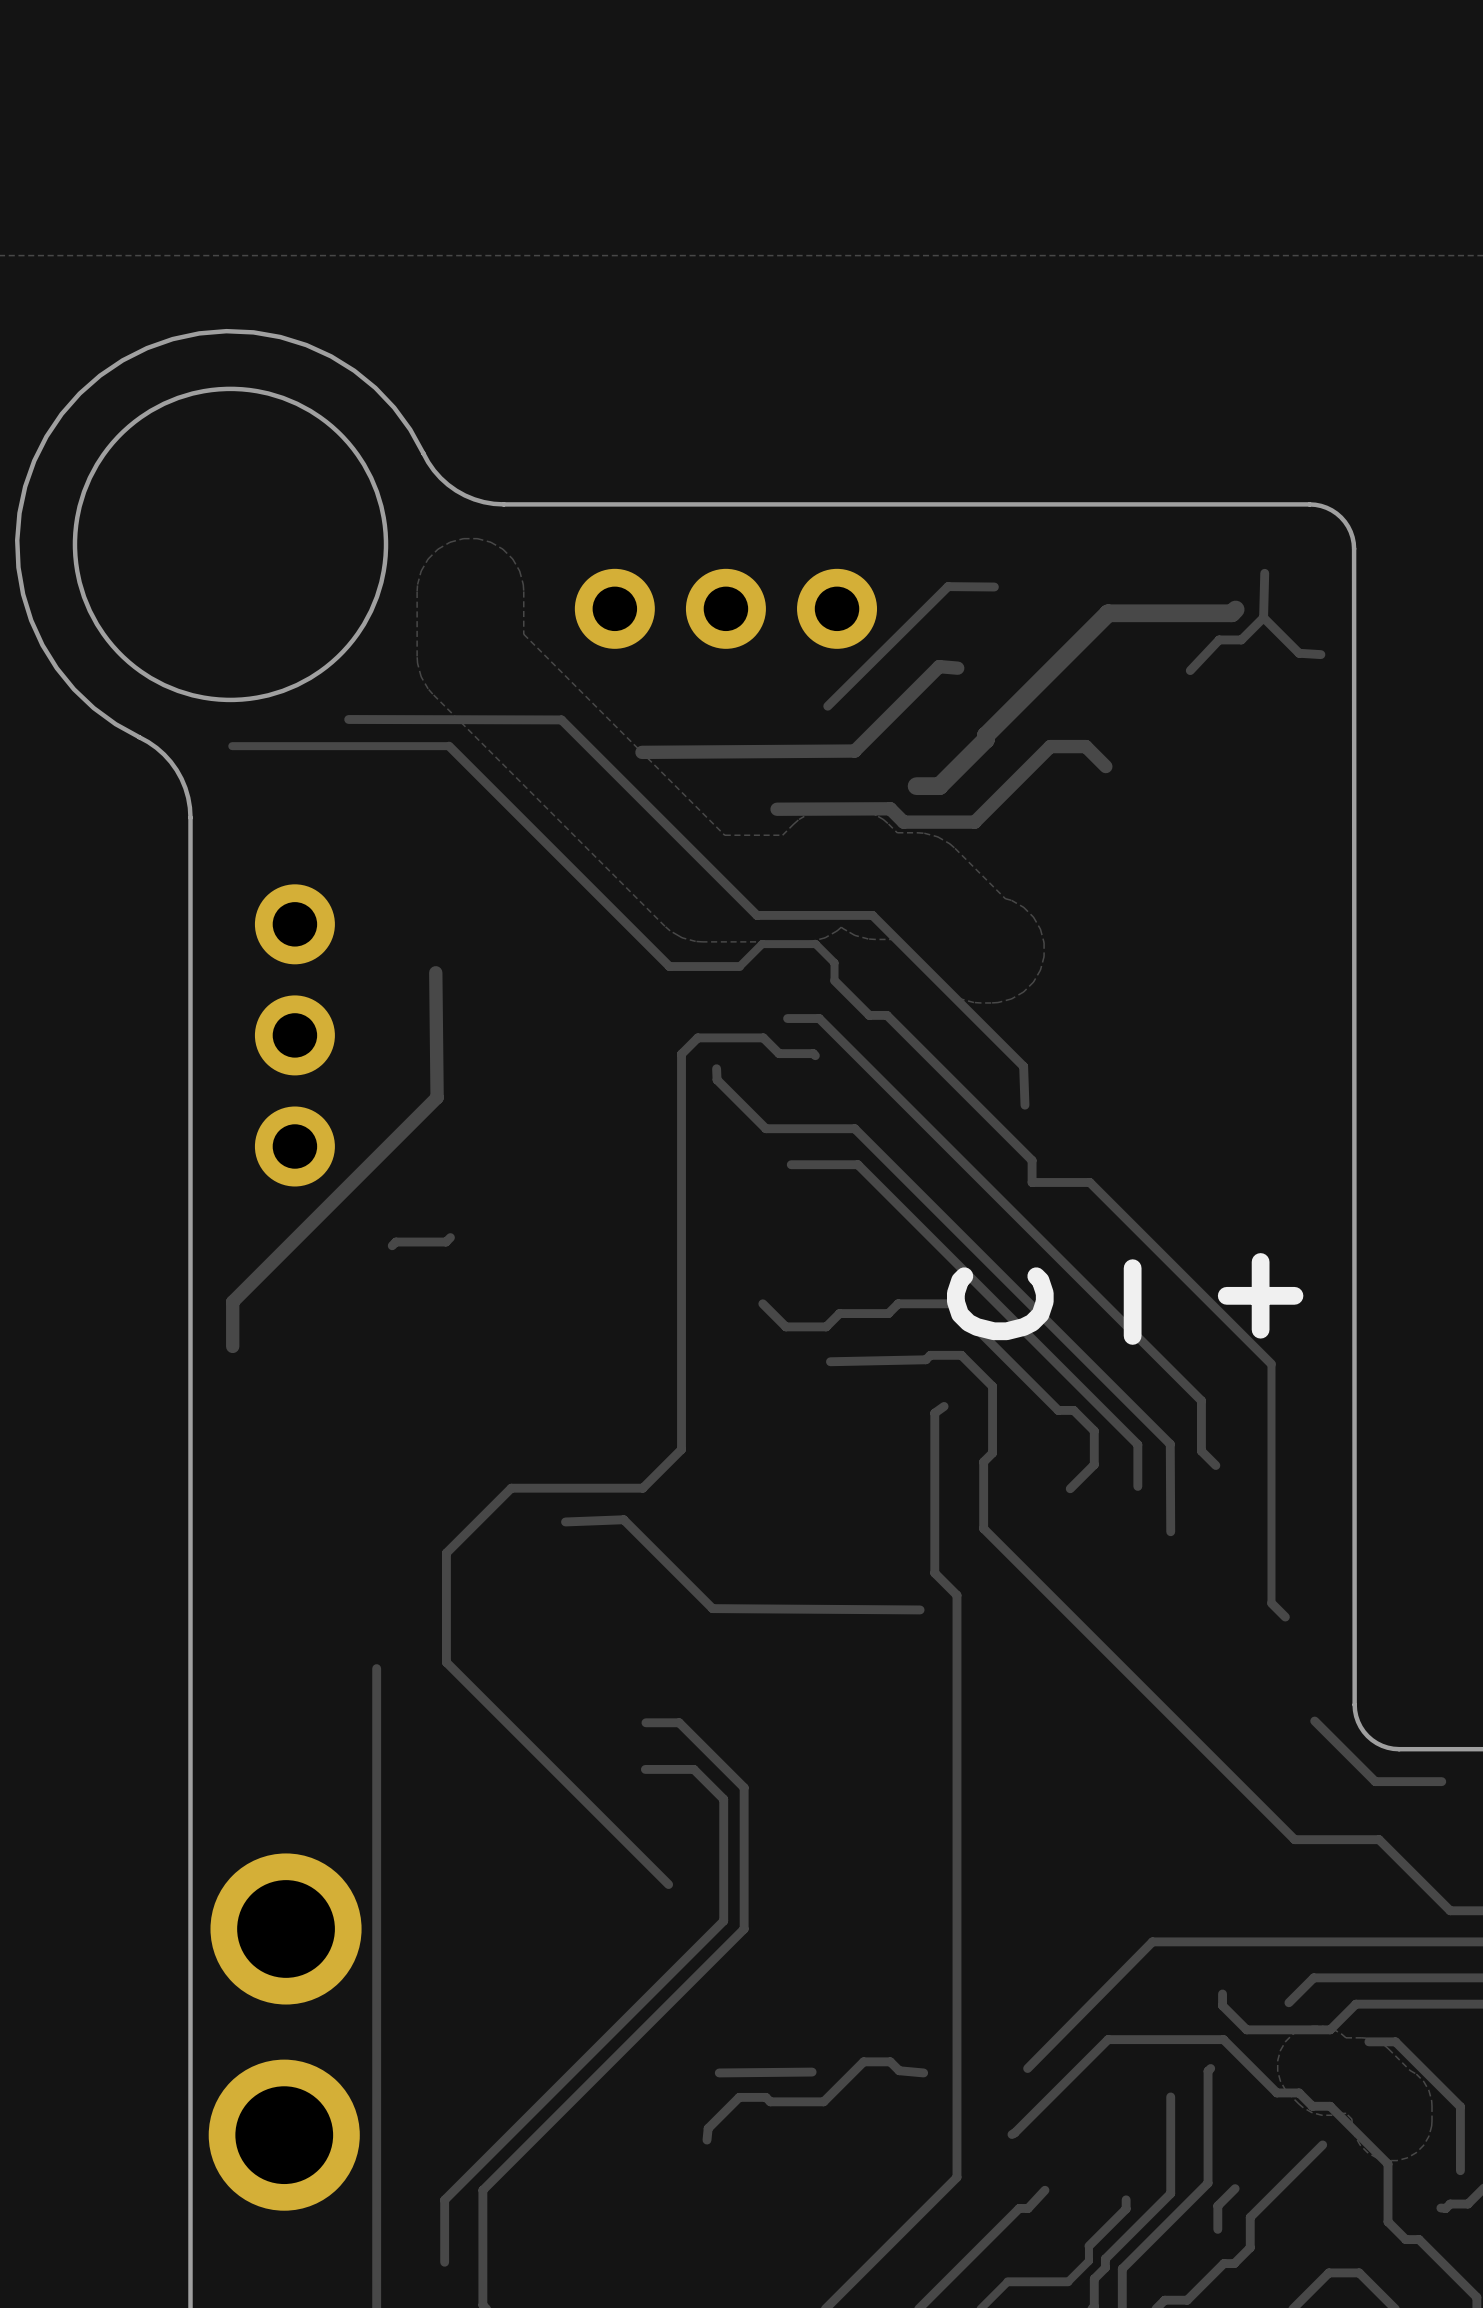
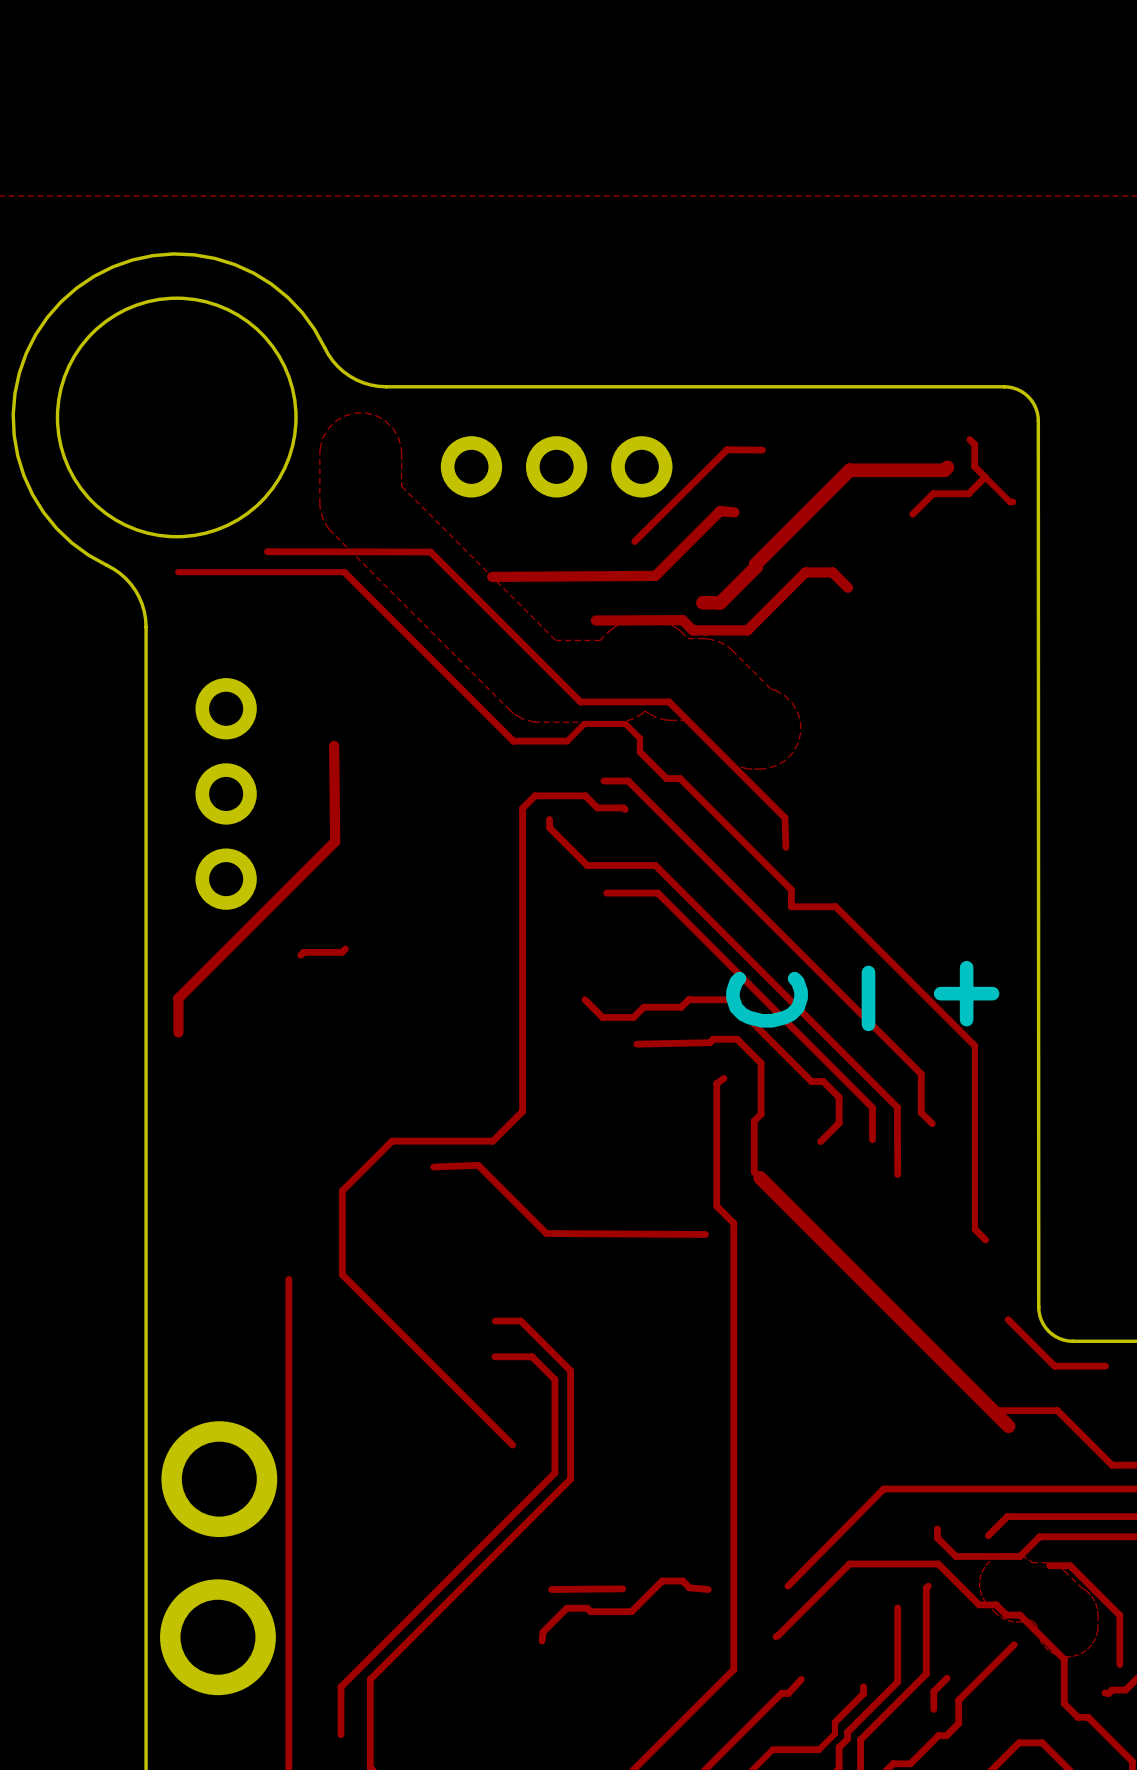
track: (1264, 573) (1263, 617) -> (969, 439) (974, 444) (974, 466) (985, 477)
track: (1263, 617) (1241, 639) (1219, 639) (1190, 670) -> (985, 477) (968, 493) (933, 493) (912, 514)
track: (1263, 617) (1299, 653) (1320, 654) -> (985, 477) (1010, 501) (1012, 501)
track width: thin (983, 1528) (1294, 1839) -> thick (754, 1172) (992, 1410)

